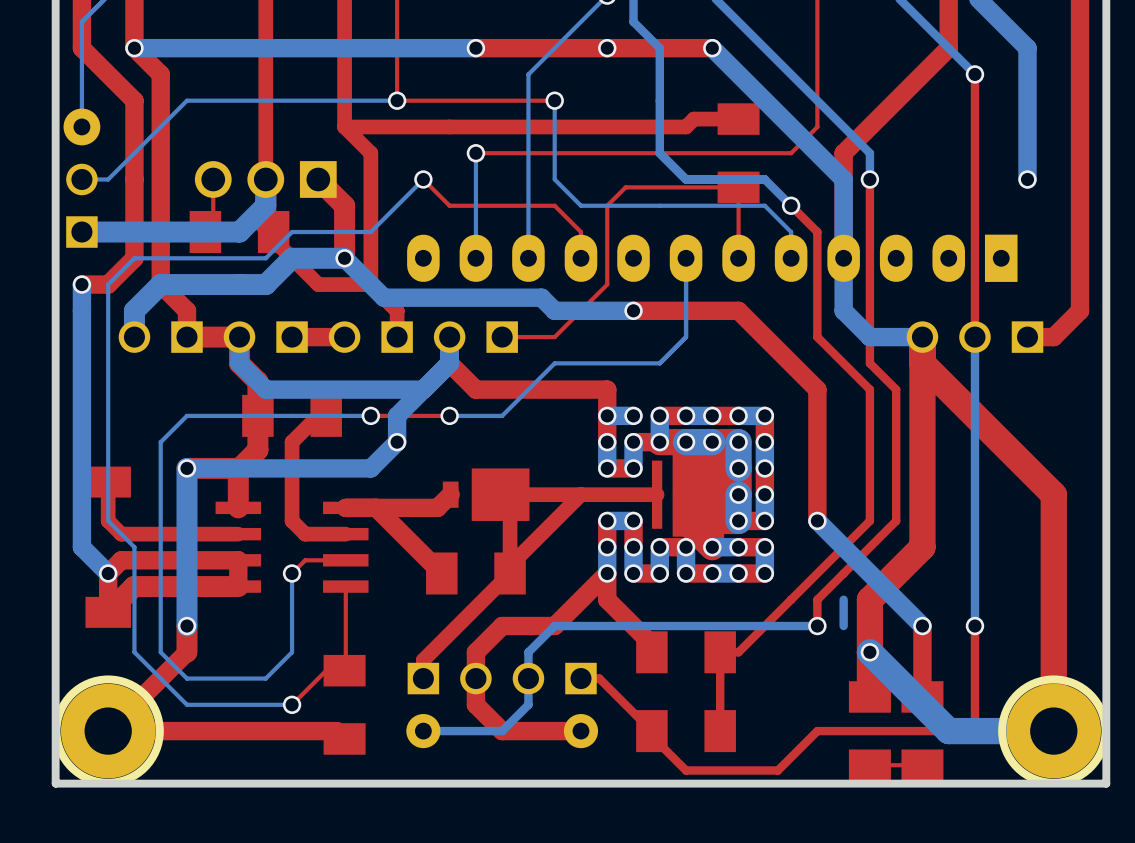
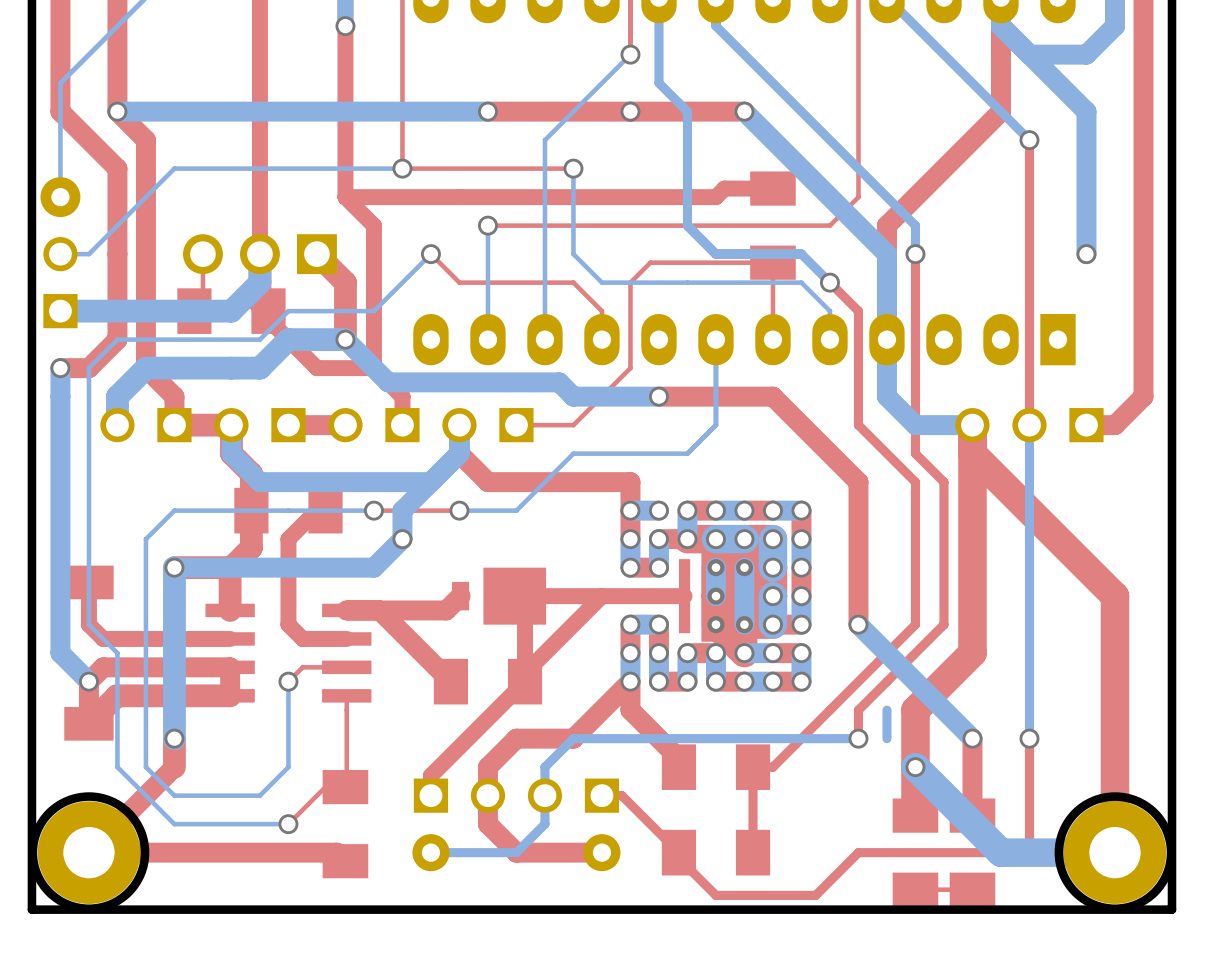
bottom track: none -> (715, 567) (715, 596)
via: none -> (715, 567)
bottom track: none -> (744, 567) (744, 624)
via: none -> (744, 567)
via: none -> (715, 596)
via: none -> (715, 624)
via: none -> (744, 624)

